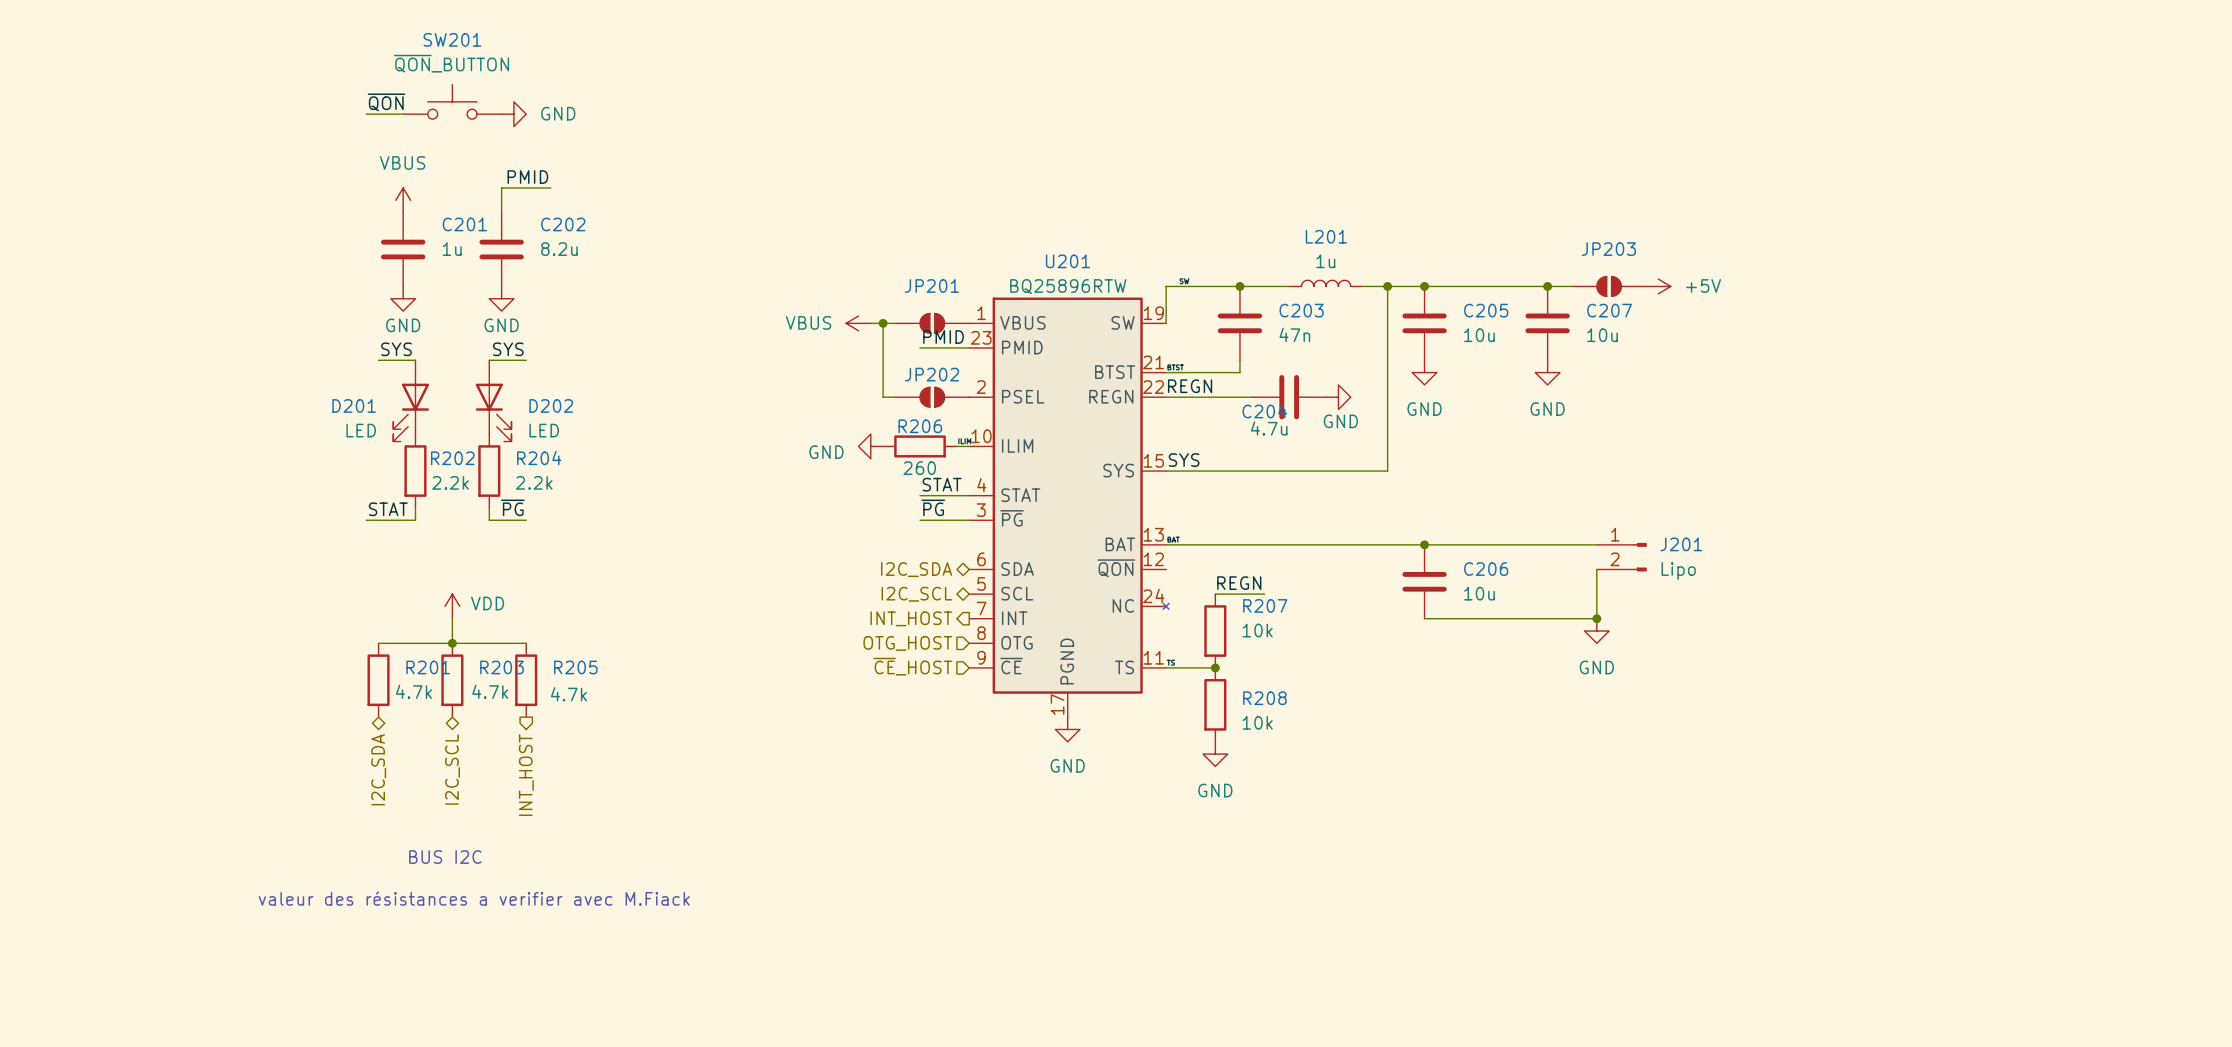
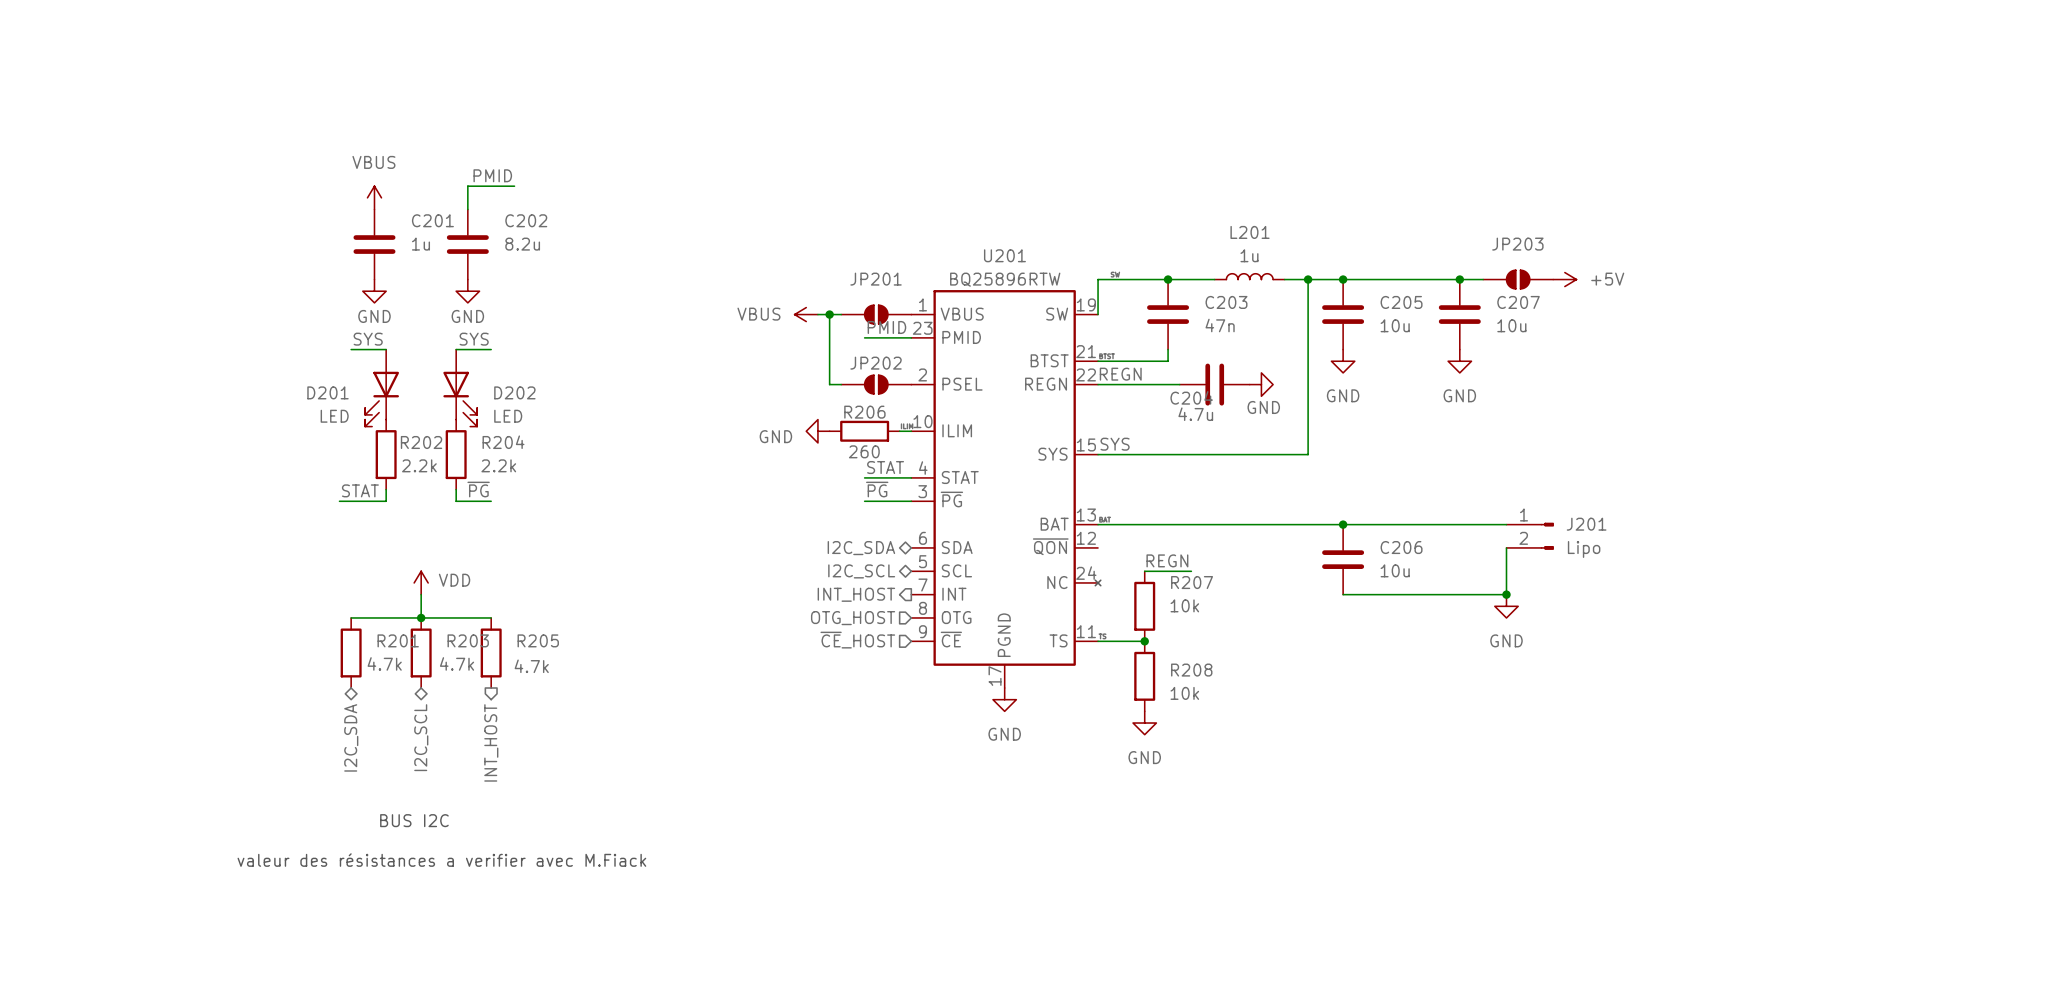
SW201: ~{QON}_BUTTON (452, 101) -> none
label: ~{QON} (386, 102) -> none
wire: (366, 114) (403, 114) -> none
power symbol: GND (513, 114) -> none

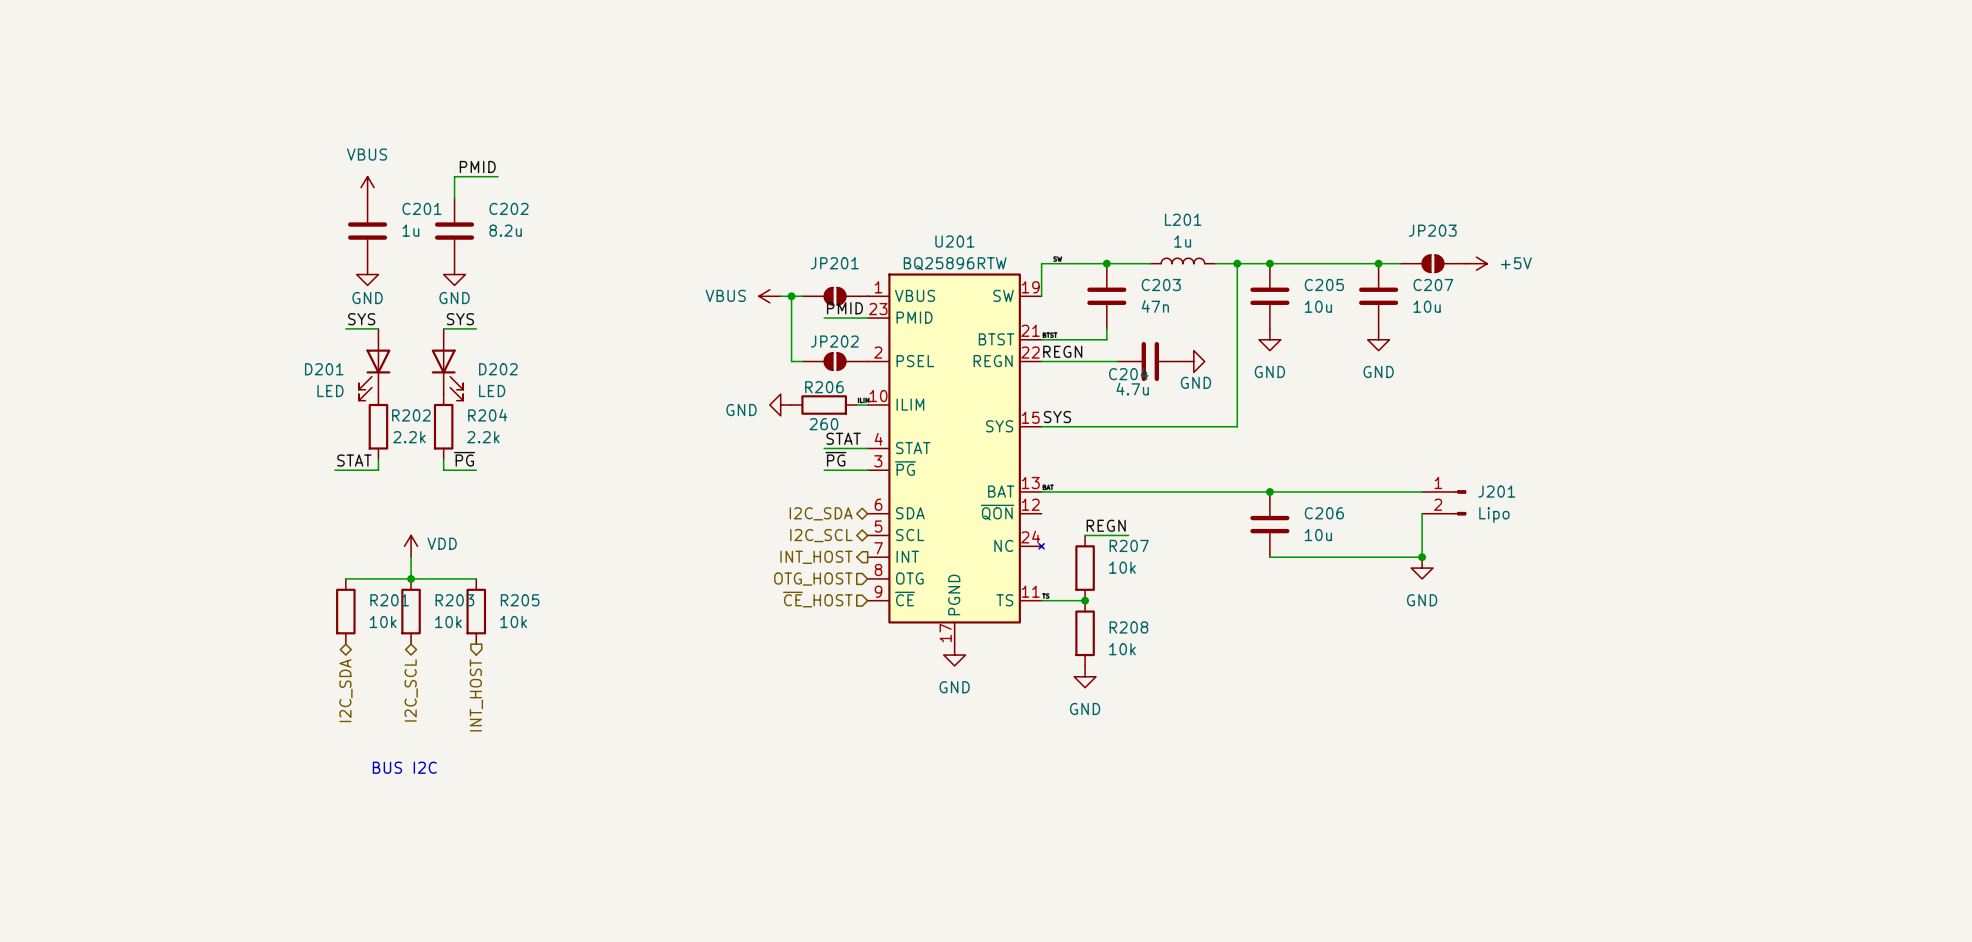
R201 value: 4.7k (384, 663) -> 10k (383, 622)
R203 value: 4.7k (457, 663) -> 10k (448, 622)
R205 value: 4.7k (531, 666) -> 10k (513, 622)
text: valeur des résistances a verifier avec M.Fiack (441, 860) -> none

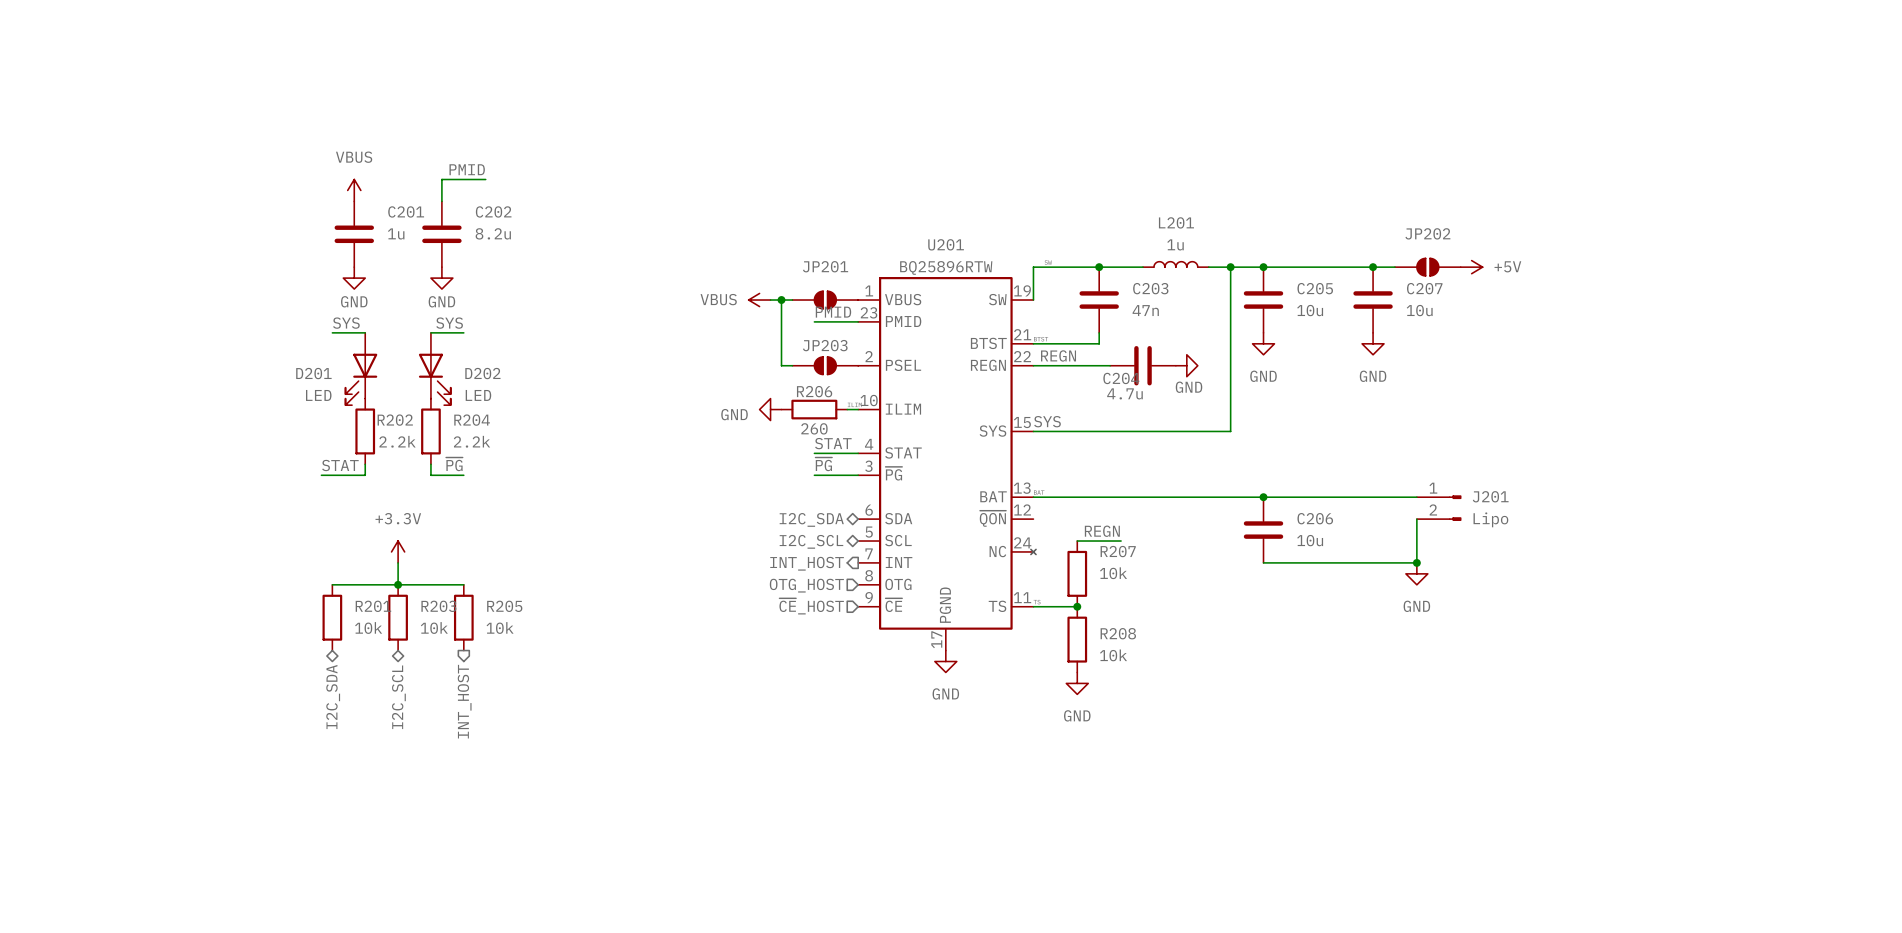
JP203 name: JP203 (1432, 230) -> JP202 (1427, 233)
JP202 name: JP202 (834, 341) -> JP203 (825, 345)
power symbol: VDD (411, 546) -> +3.3V (398, 551)
text: BUS I2C (404, 767) -> none

